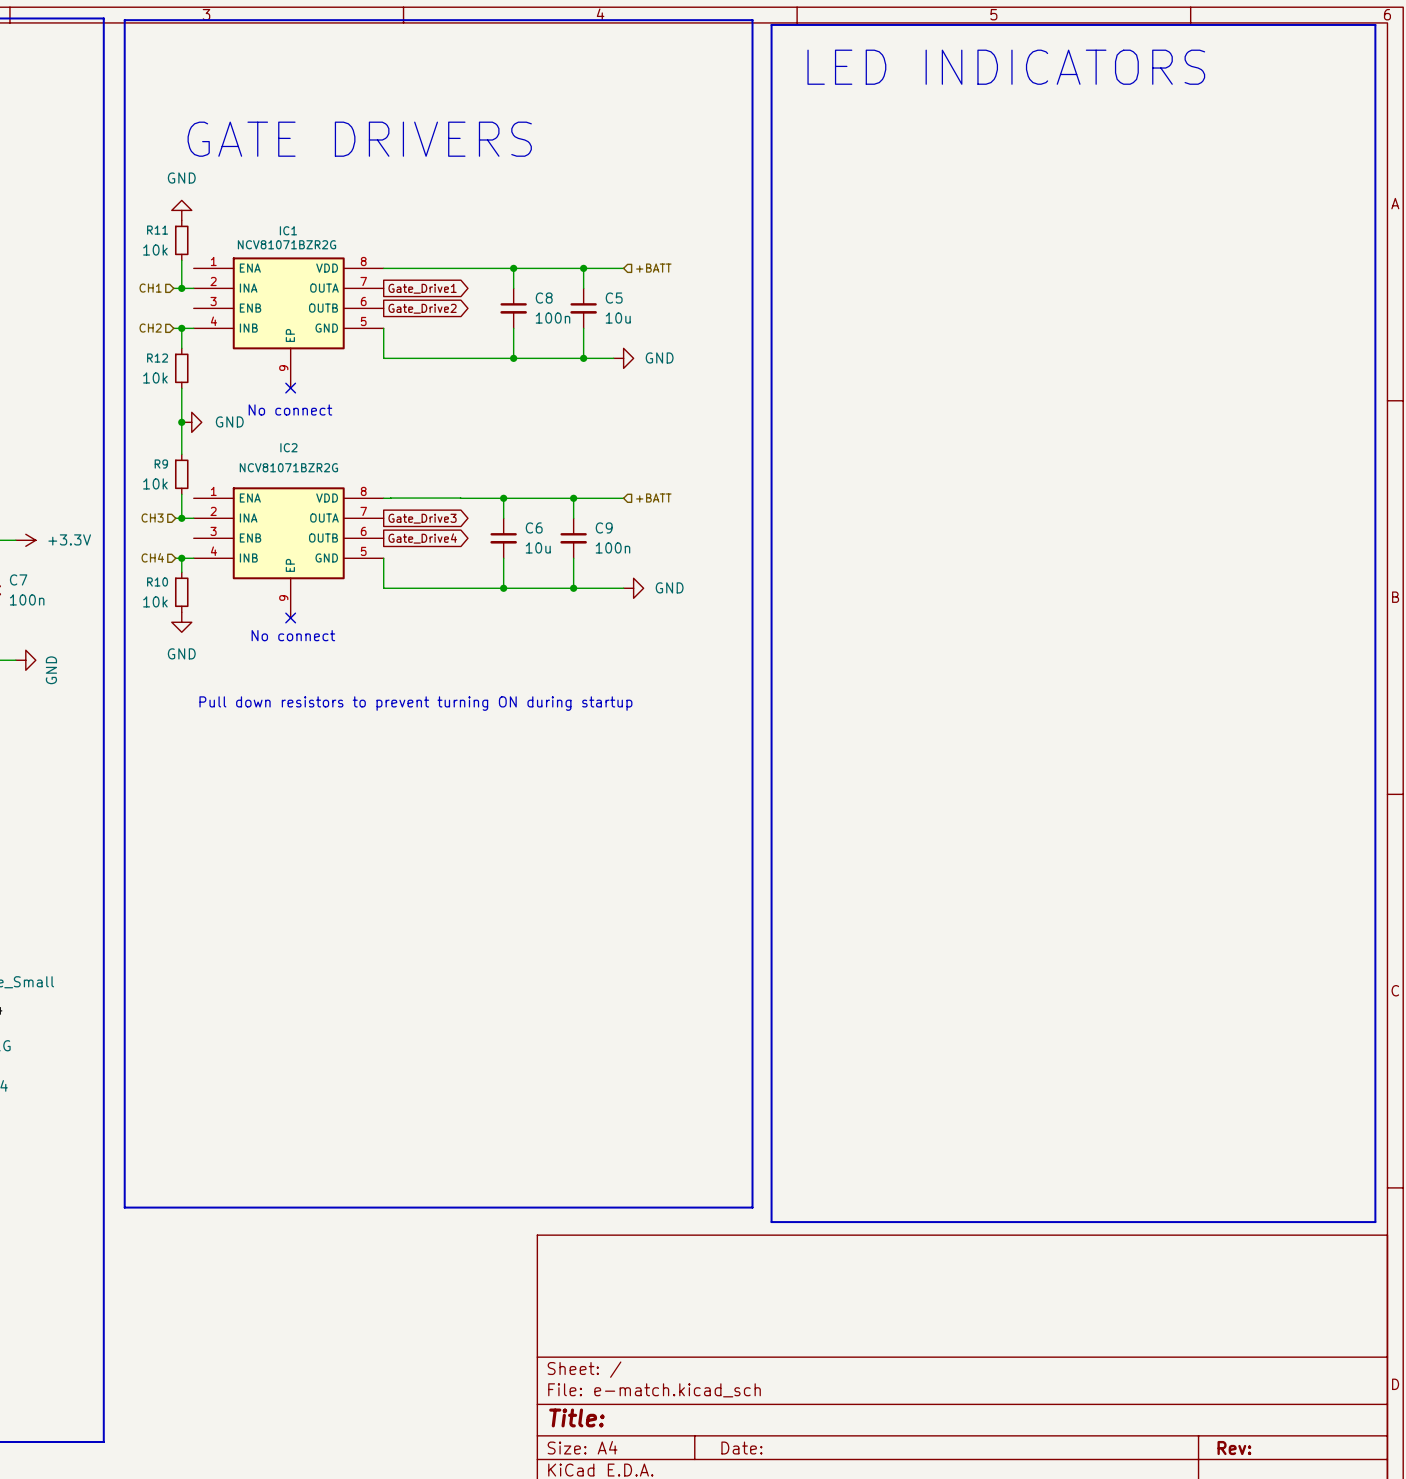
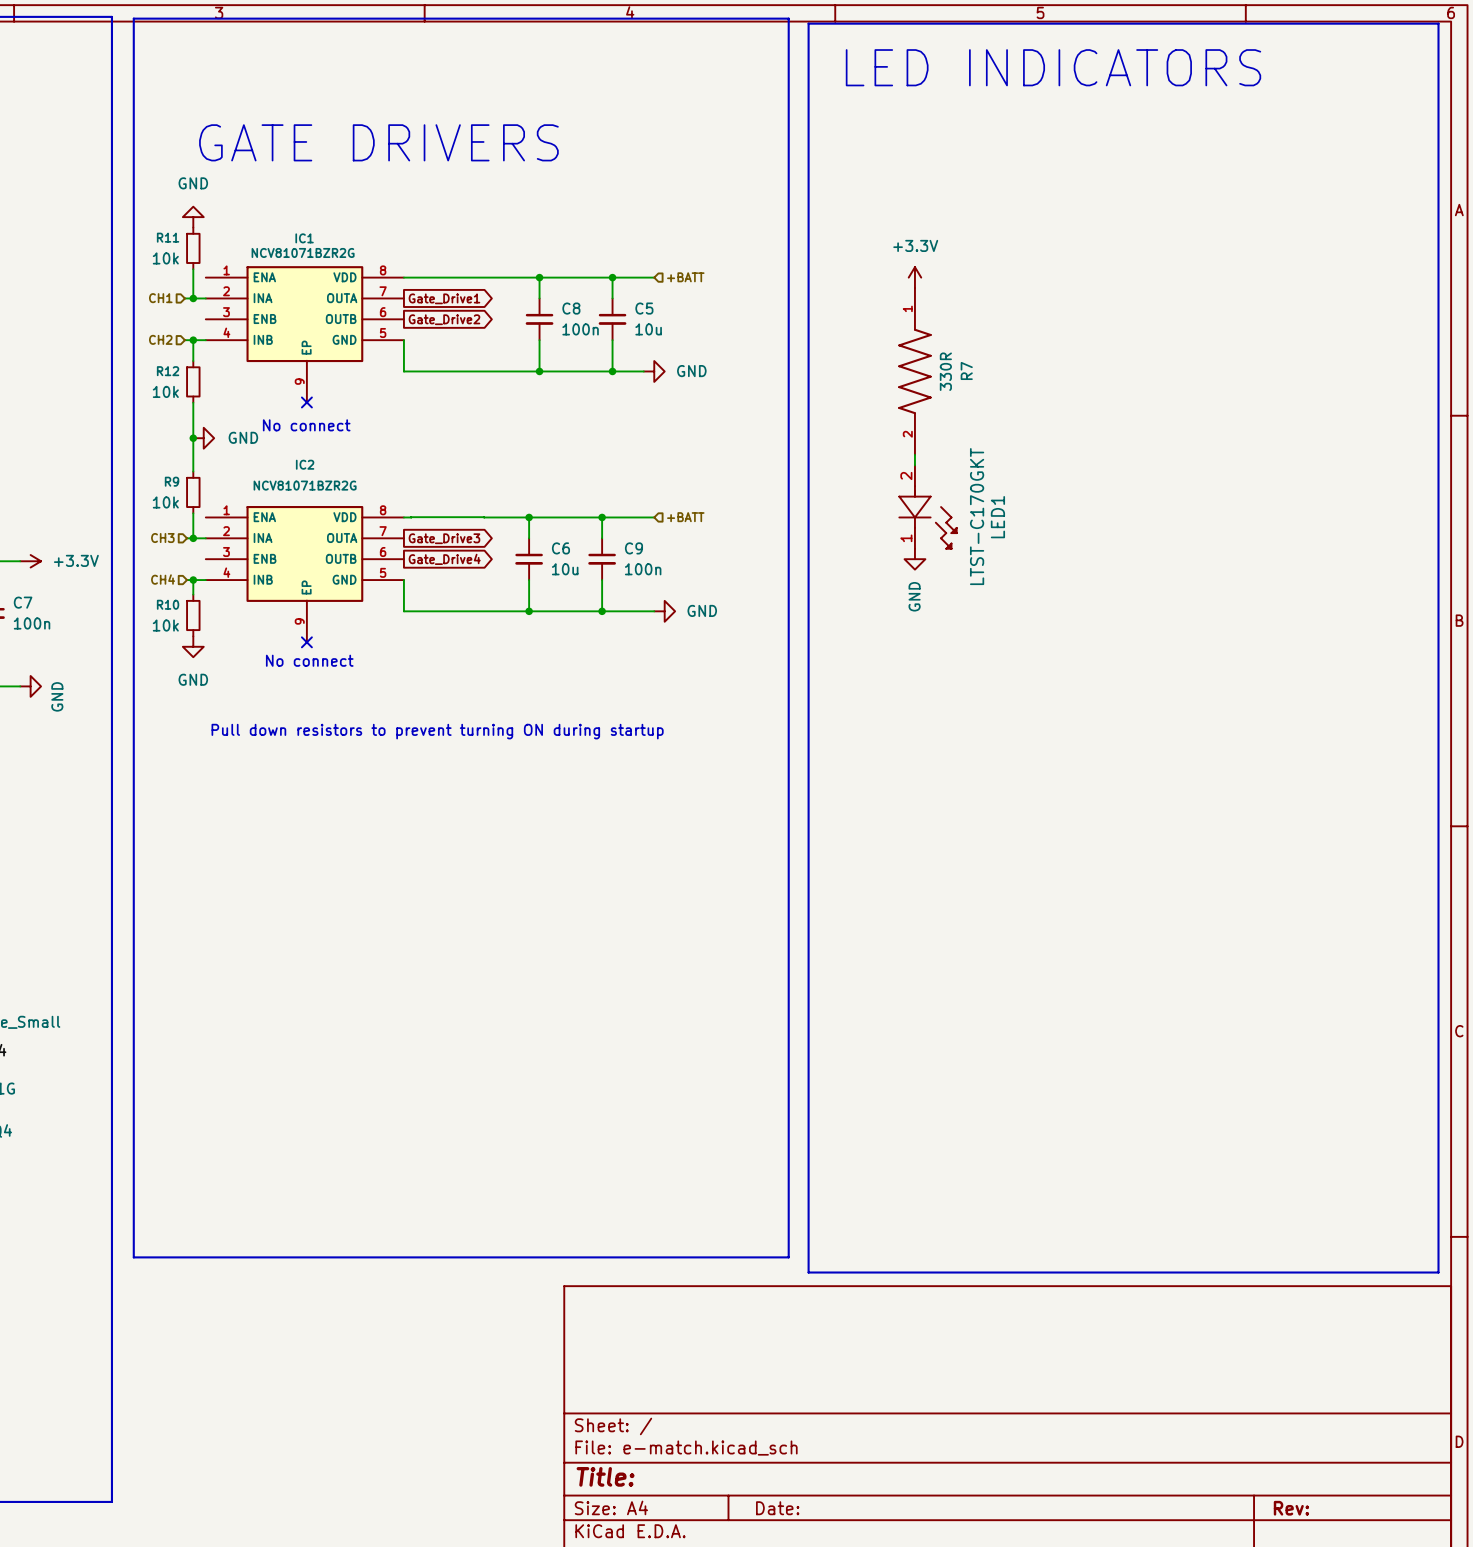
power symbol: none -> +3.3V (914, 277)
R7: none -> 330R (914, 371)
wire: none -> (914, 454) (914, 465)
LED1: none -> LTST-C170GKT (928, 507)
power symbol: none -> GND (914, 559)

